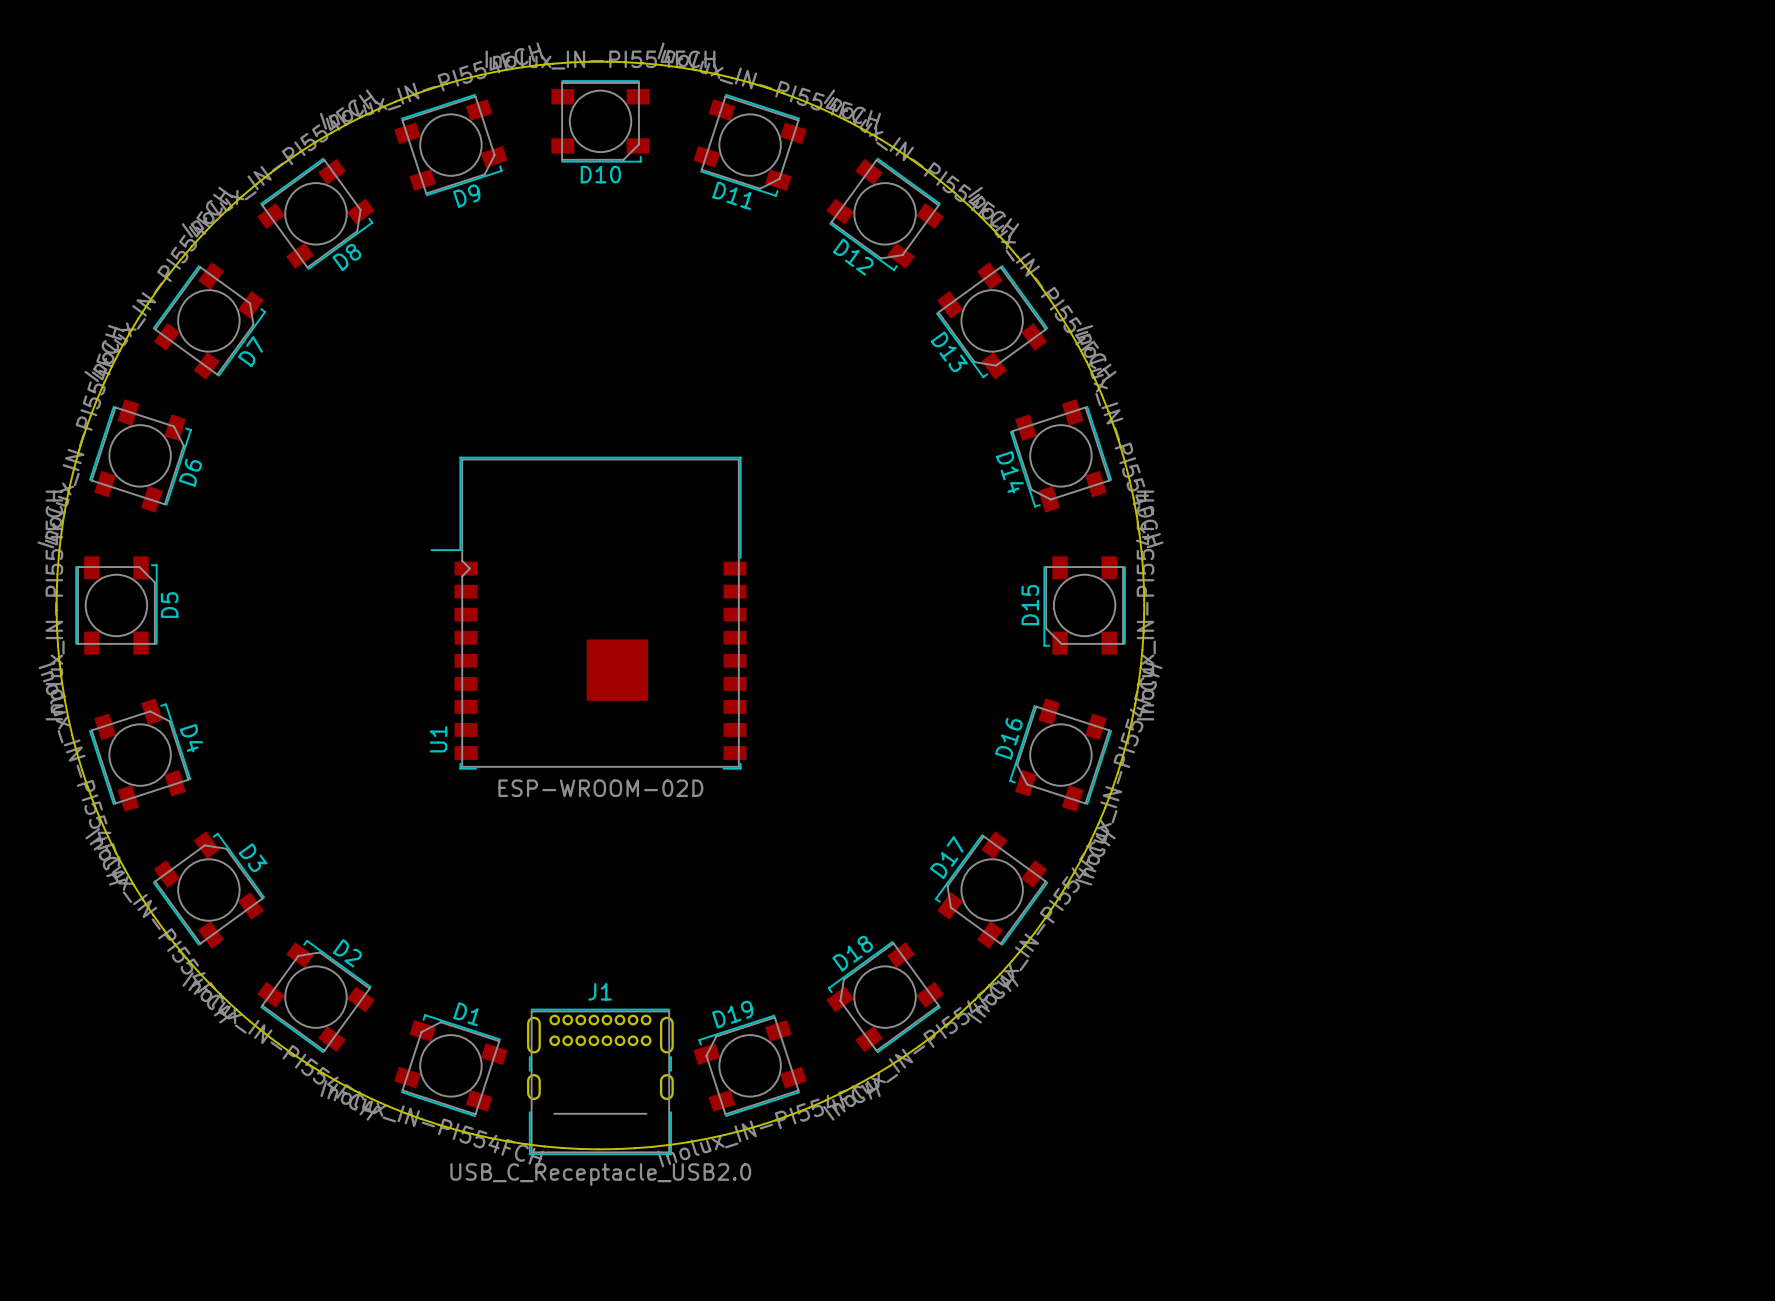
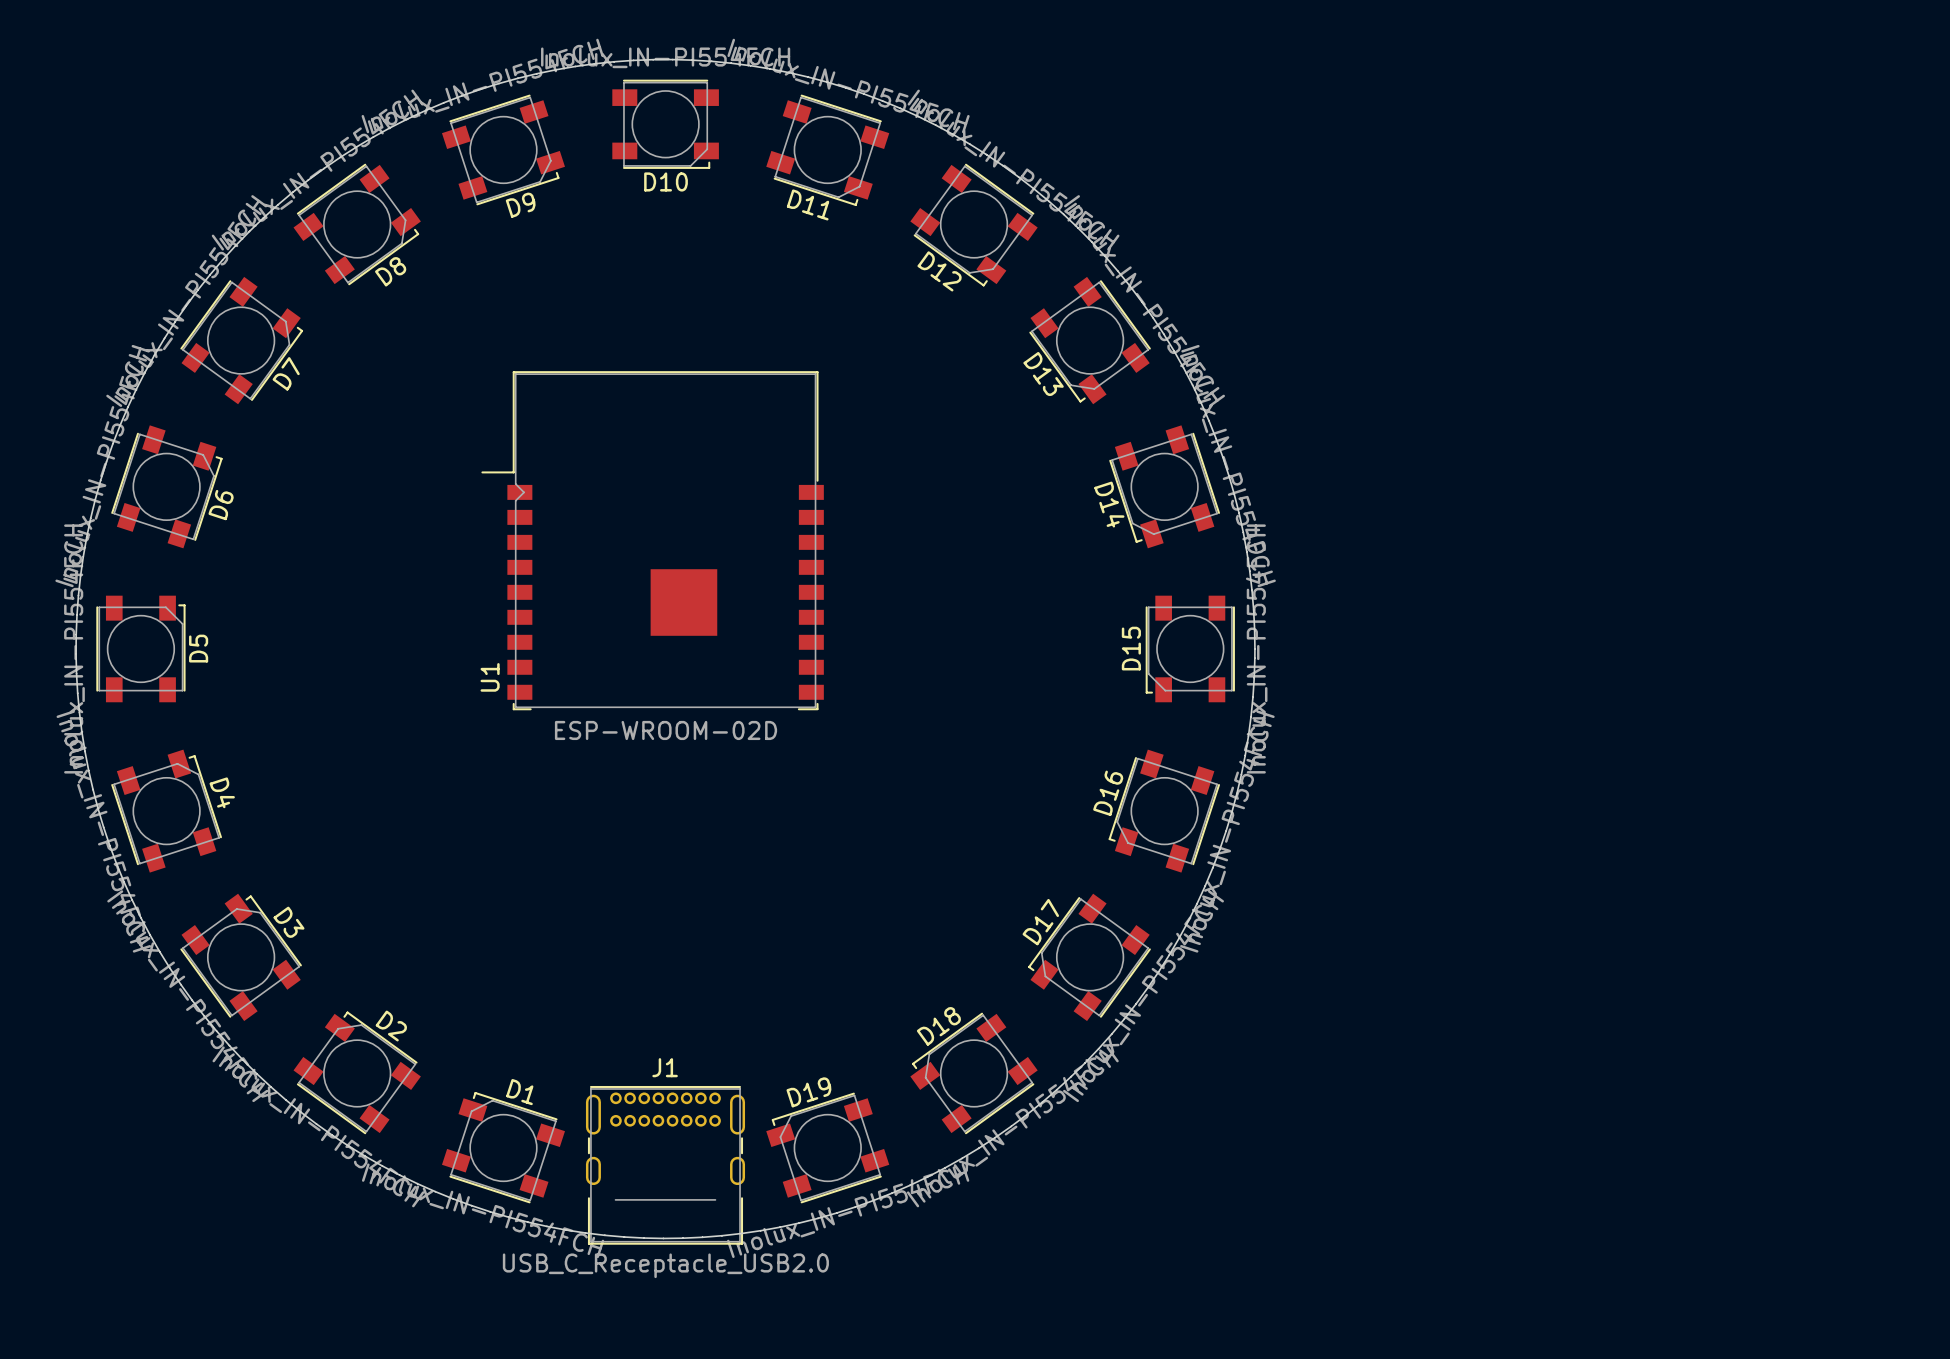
U1 position: (588, 613) -> (652, 540)

